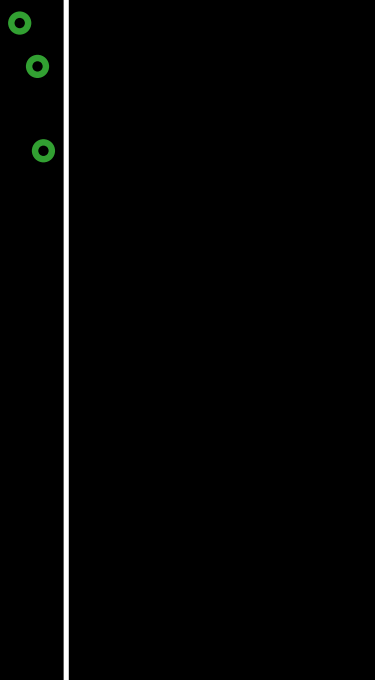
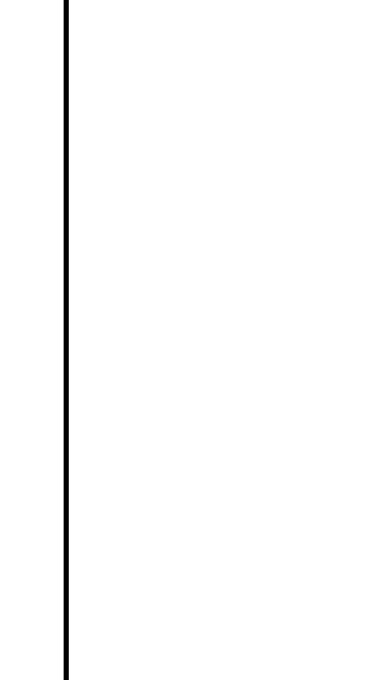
via: (19, 23) -> none
via: (37, 66) -> none
via: (43, 150) -> none

